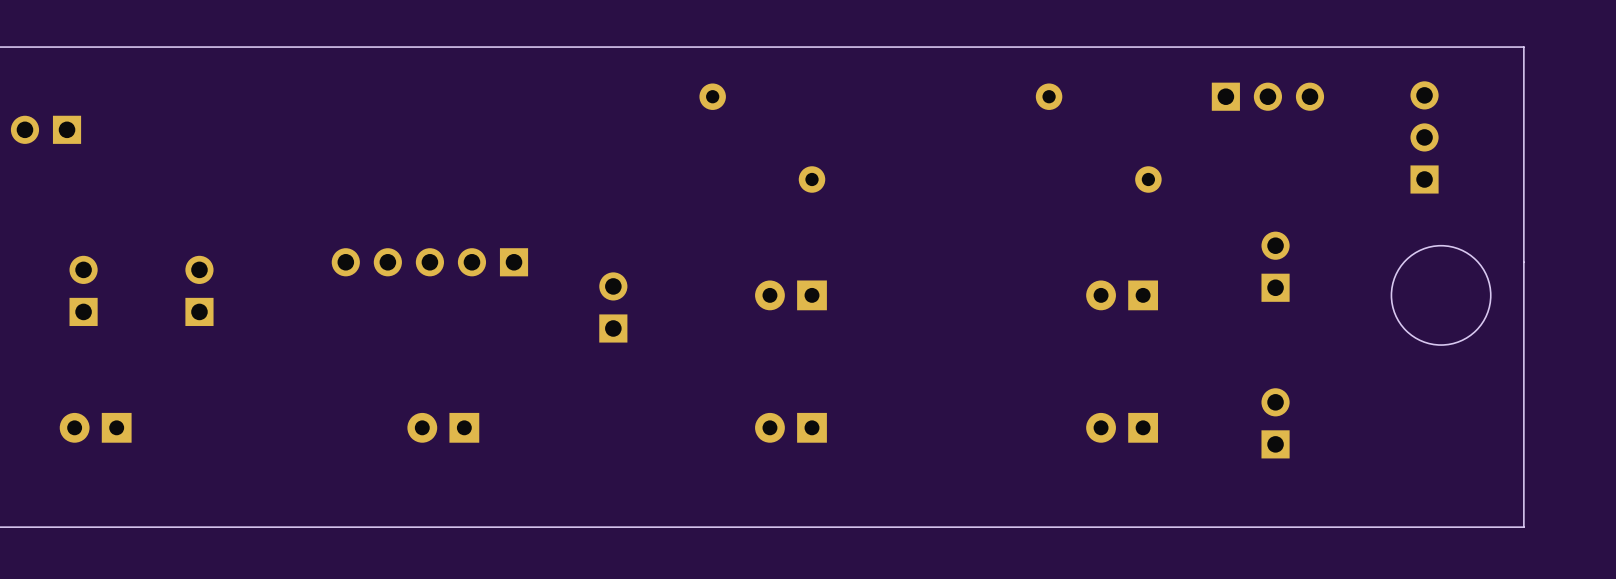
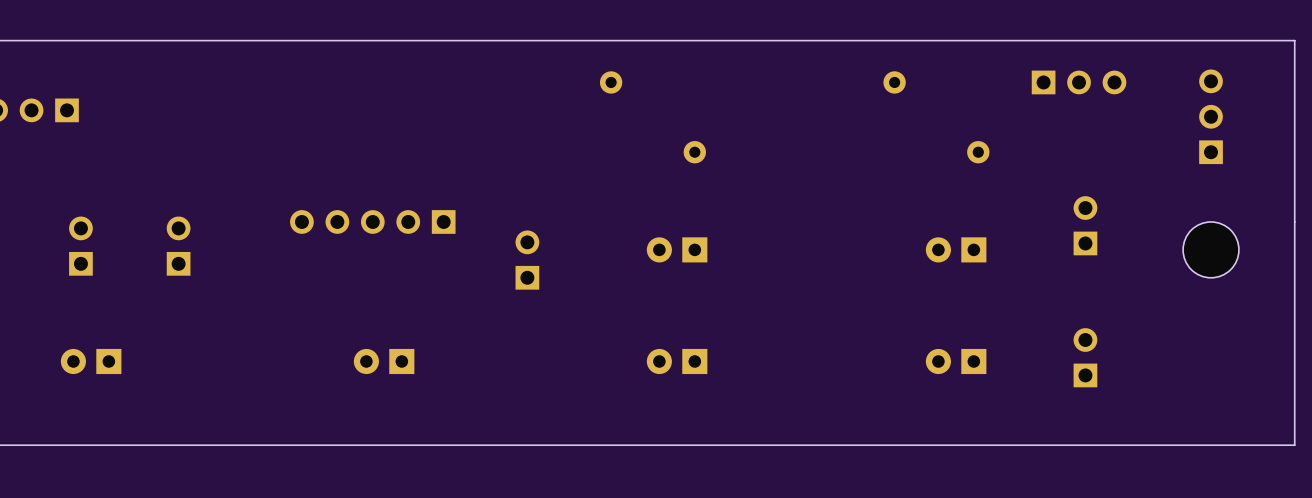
round board edge: [1391, 245, 1492, 346] -> none
part: none -> (1211, 249)

